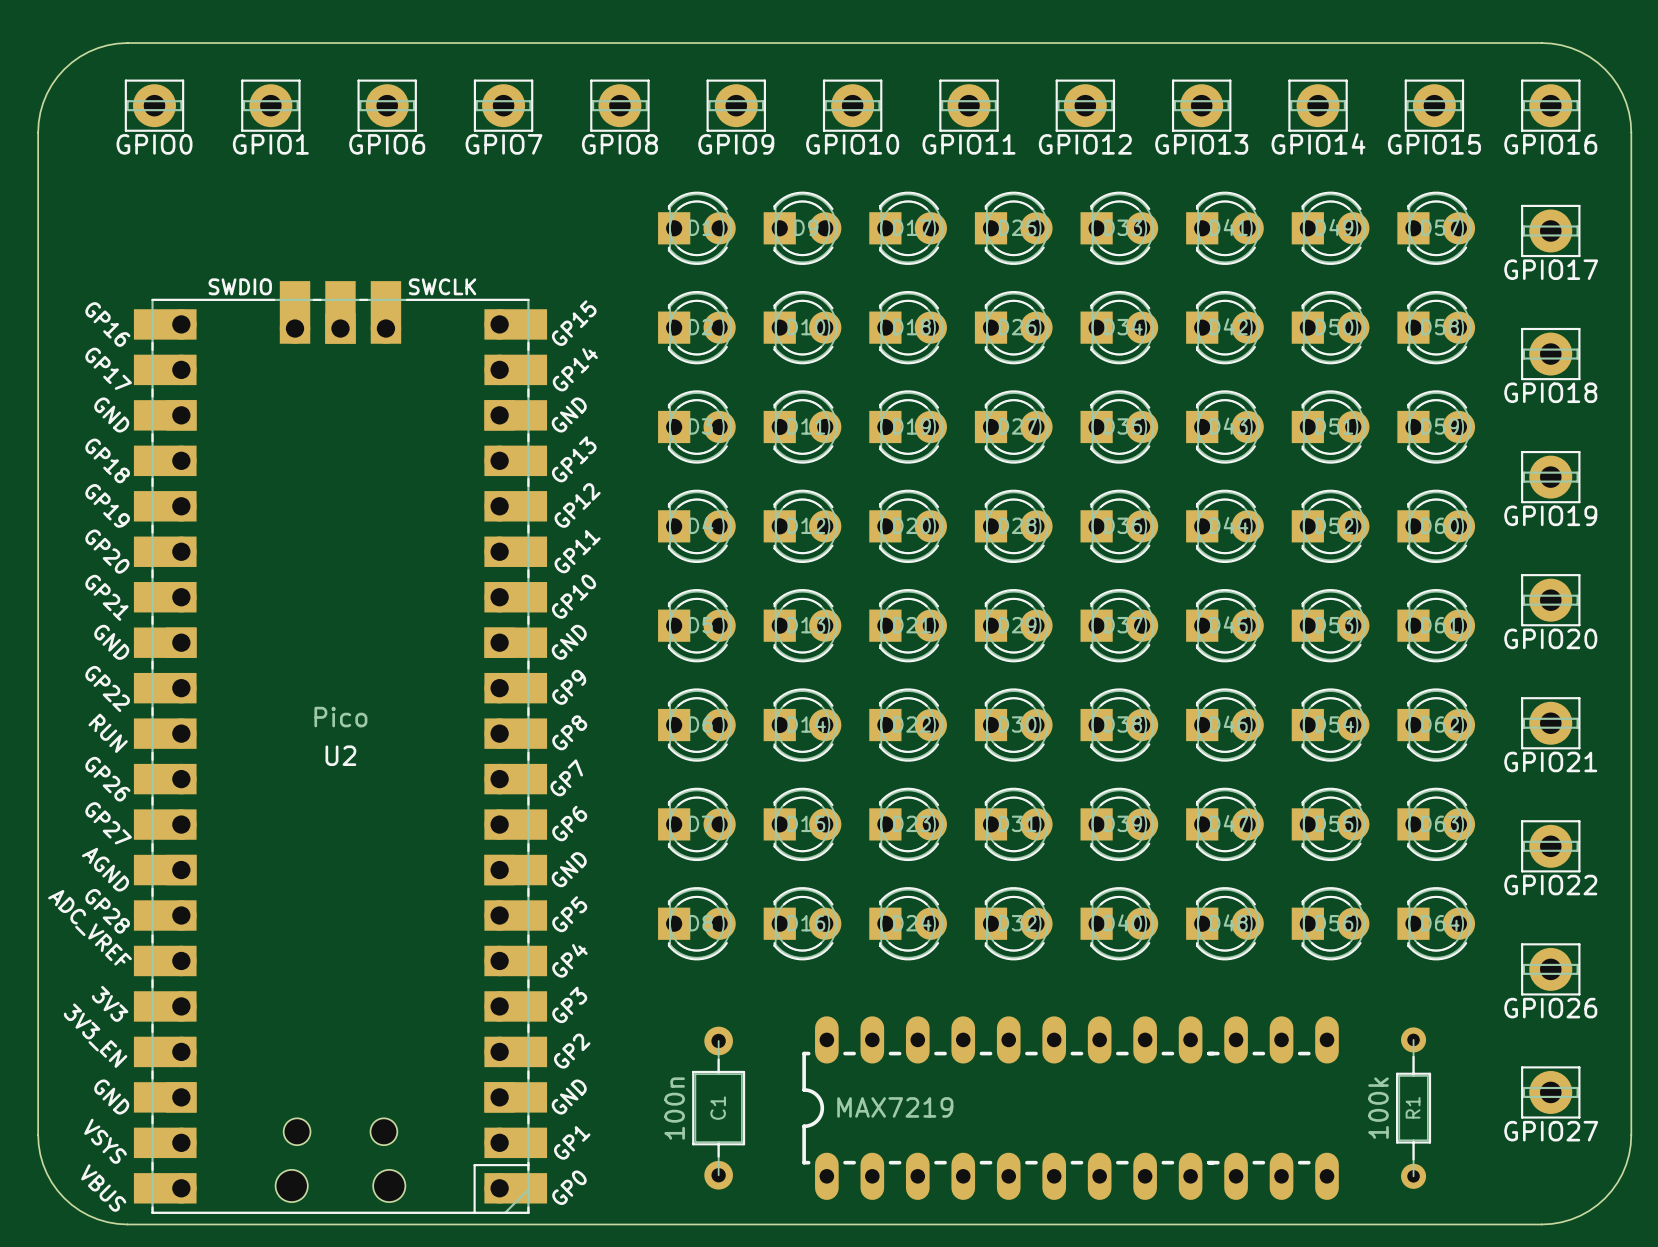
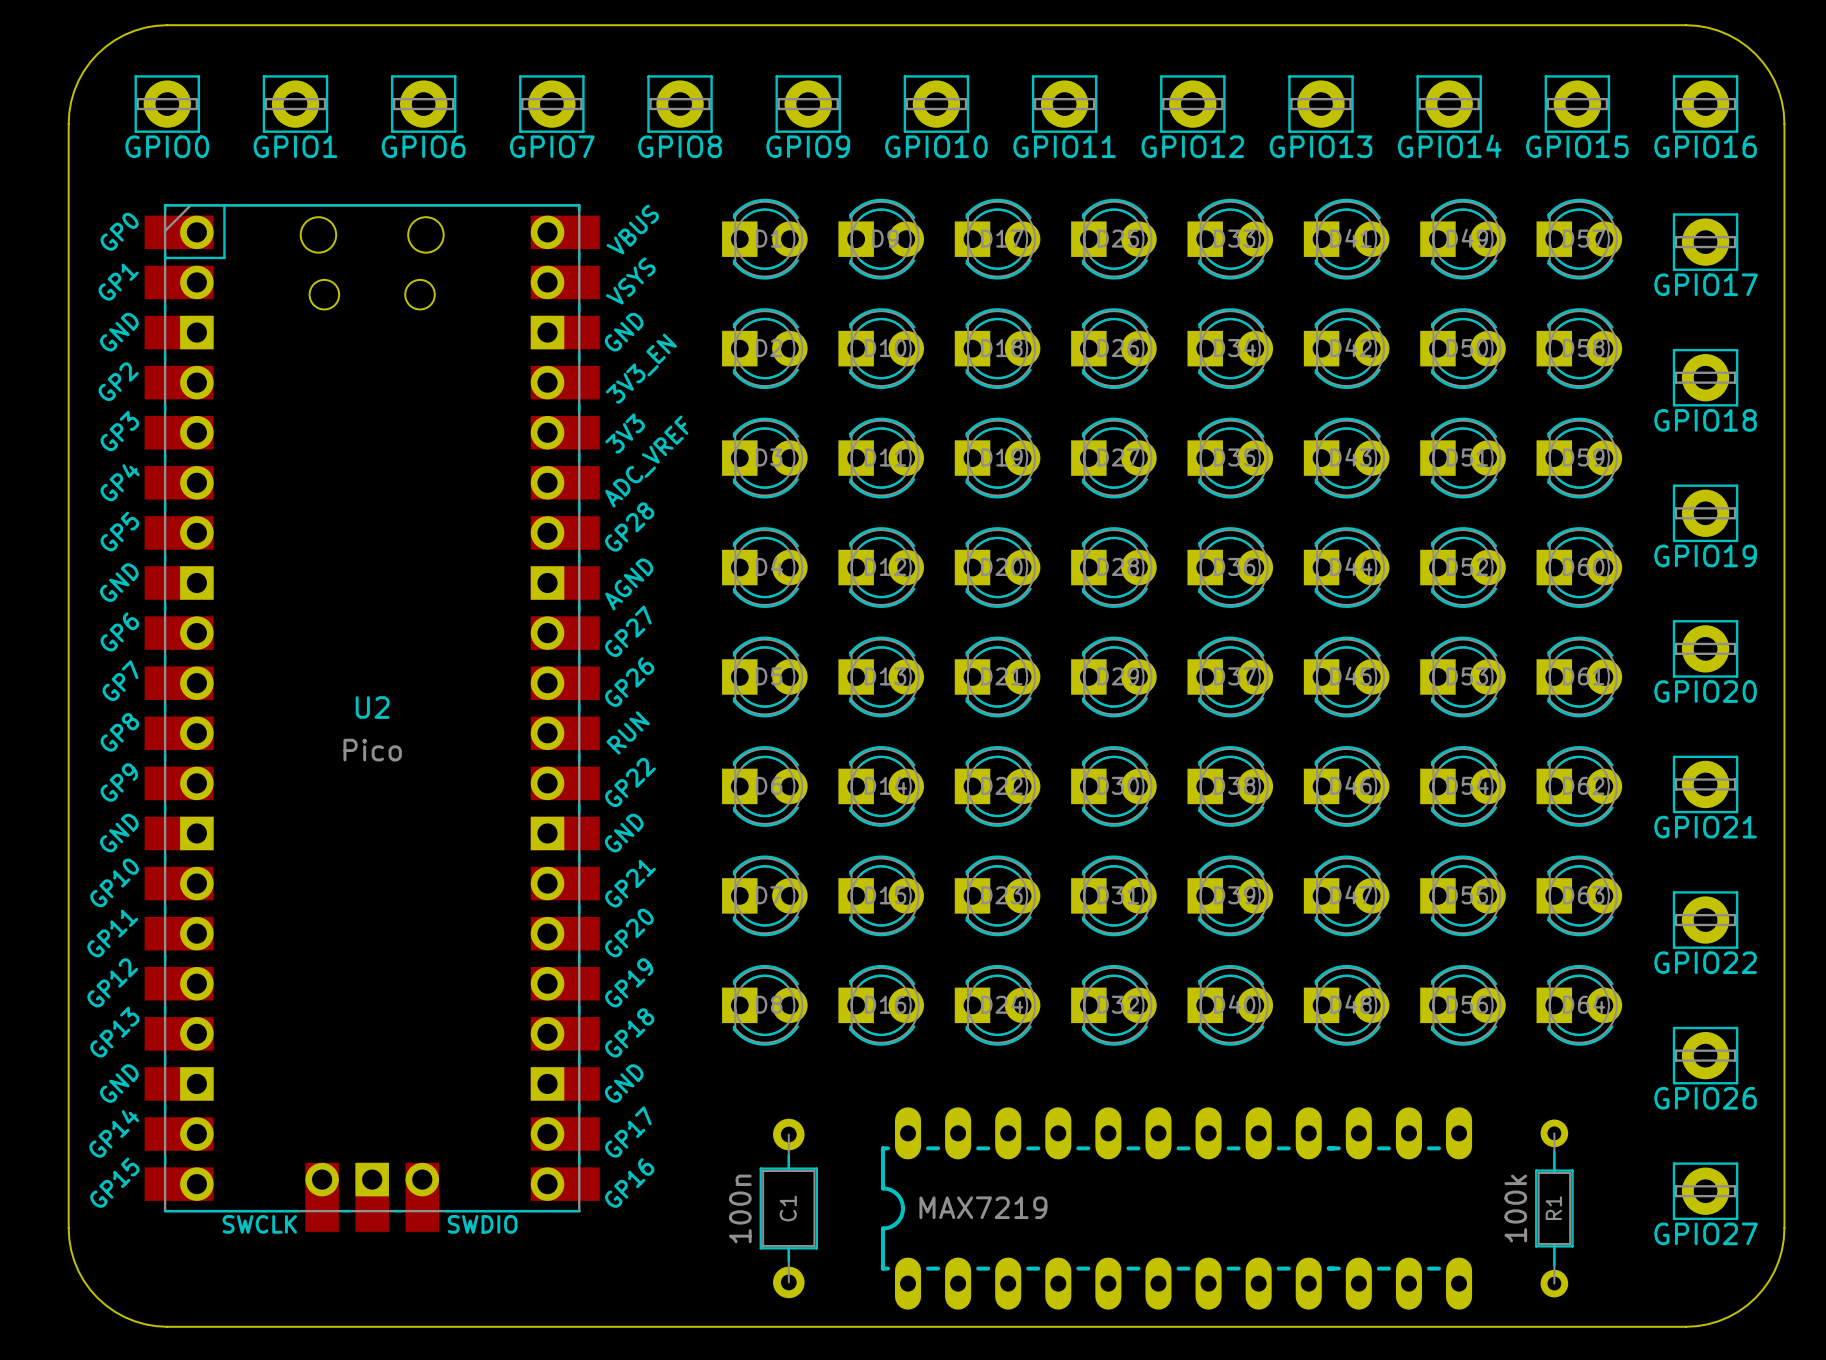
board edge: (127, 43) (1541, 43) (1571, 48) (1597, 62) (1611, 76) (1622, 93) (1629, 112) (1631, 132) (1631, 1134) (1626, 1164) (1611, 1190) (1597, 1204) (1580, 1215) (1561, 1222) (1541, 1224) (127, 1224) (98, 1219) (71, 1204) (57, 1190) (47, 1173) (40, 1154) (38, 1134) (38, 132) (43, 102) (51, 84) (64, 69) (80, 56) (98, 48) (127, 43) -> (167, 25) (134, 30) (114, 40) (97, 54) (78, 81) (71, 101) (68, 123) (68, 1228) (71, 1250) (78, 1270) (90, 1289) (105, 1305) (134, 1321) (167, 1326) (1685, 1326) (1707, 1324) (1728, 1317) (1747, 1305) (1762, 1289) (1778, 1260) (1784, 1228) (1784, 123) (1781, 101) (1774, 81) (1762, 62) (1747, 46) (1718, 30) (1685, 25) (167, 25)
U2 footprint: [133, 281, 548, 1214] -> [144, 204, 600, 1232]
U2 value position: Pico (340, 717) -> Pico (372, 750)

